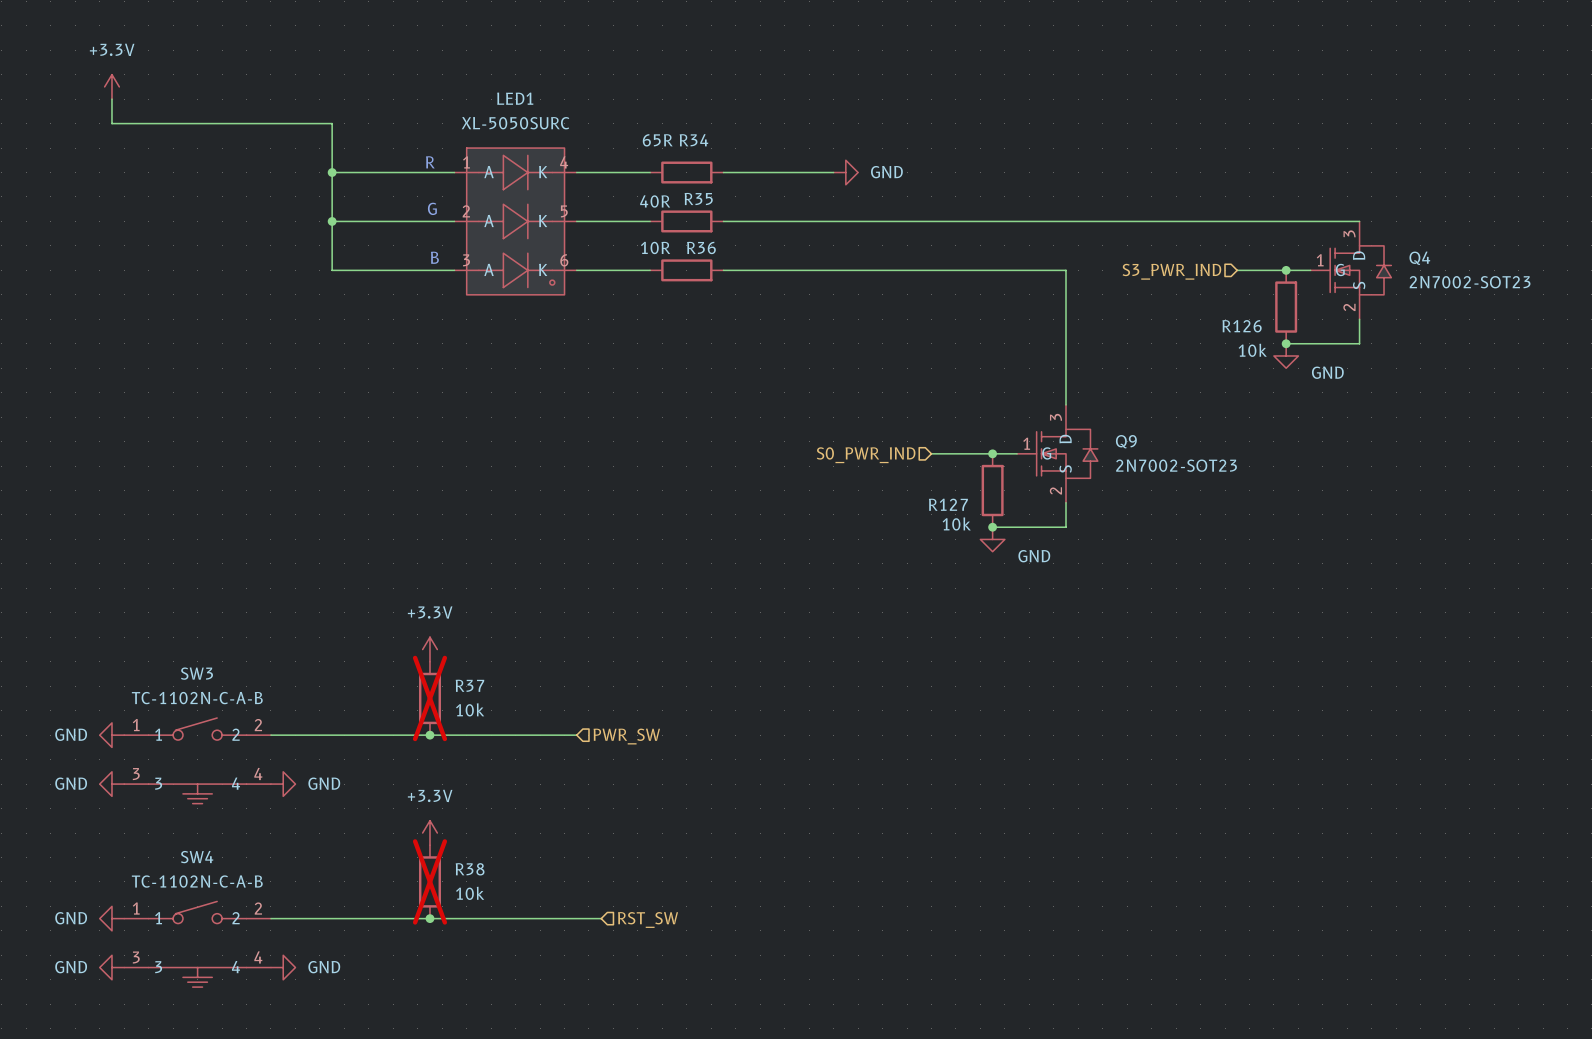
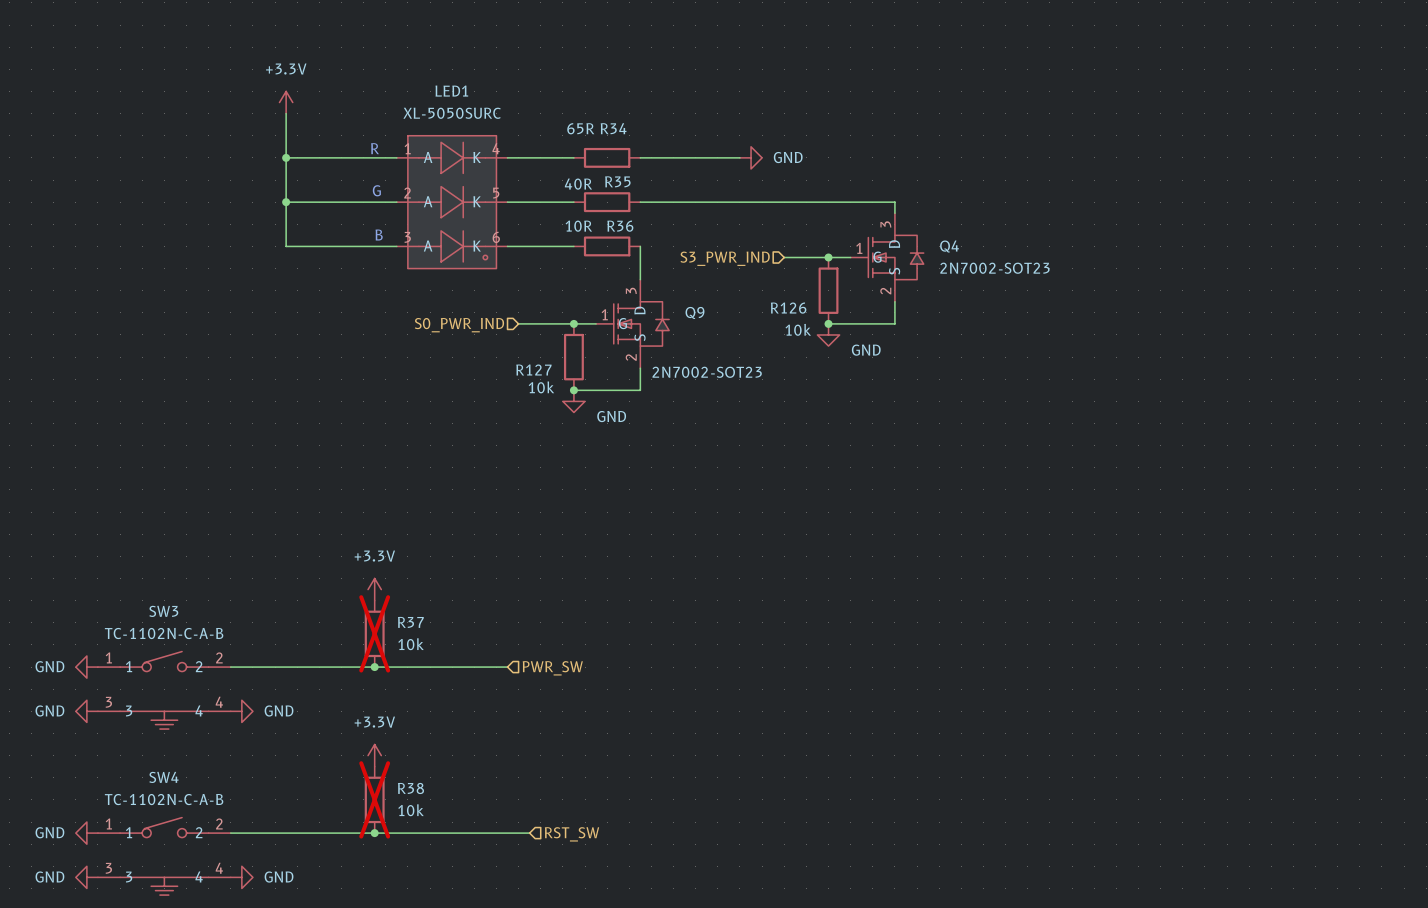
power symbol position: +3.3V (111, 86) -> +3.3V (286, 102)
wire: (111, 99) (111, 123) (332, 123) -> none
wire: (1004, 221) (1359, 221) -> (894, 202) (894, 213)
wire: (723, 270) (1066, 270) (1066, 404) -> (640, 246) (640, 279)
wire: (1237, 270) (1310, 270) -> none
junction: (1286, 270) -> none
Q4 position: (1350, 270) -> (887, 257)
hierarchical label: S3_PWR_IND (1171, 271) -> none
wire: none -> (784, 257) (850, 257)
junction: none -> (828, 257)
hierarchical label: none -> S3_PWR_IND (725, 258)
R126 position: (1286, 307) -> (828, 290)
wire: (1359, 319) (1359, 343) (1286, 343) -> none
junction: (1286, 343) -> none
wire: none -> (518, 323) (596, 323)
junction: none -> (573, 323)
junction: none -> (828, 323)
power symbol: GND (1286, 355) -> none
hierarchical label: none -> S0_PWR_IND (459, 325)
power symbol: none -> GND (828, 334)
wire: none -> (640, 368) (640, 390) (573, 390)
junction: none -> (573, 390)
power symbol: none -> GND (573, 401)
wire: (931, 453) (1017, 453) -> none
junction: (992, 453) -> none
Q9 position: (1057, 453) -> (632, 323)
hierarchical label: S0_PWR_IND (866, 455) -> none
Q9 value position: 2N7002-SOT23 (1176, 465) -> 2N7002-SOT23 (707, 372)
R127 position: (992, 490) -> (573, 357)
wire: (1066, 502) (1066, 527) (992, 527) -> (894, 301) (894, 323) (828, 323)
junction: (992, 527) -> none
power symbol: GND (992, 539) -> none

